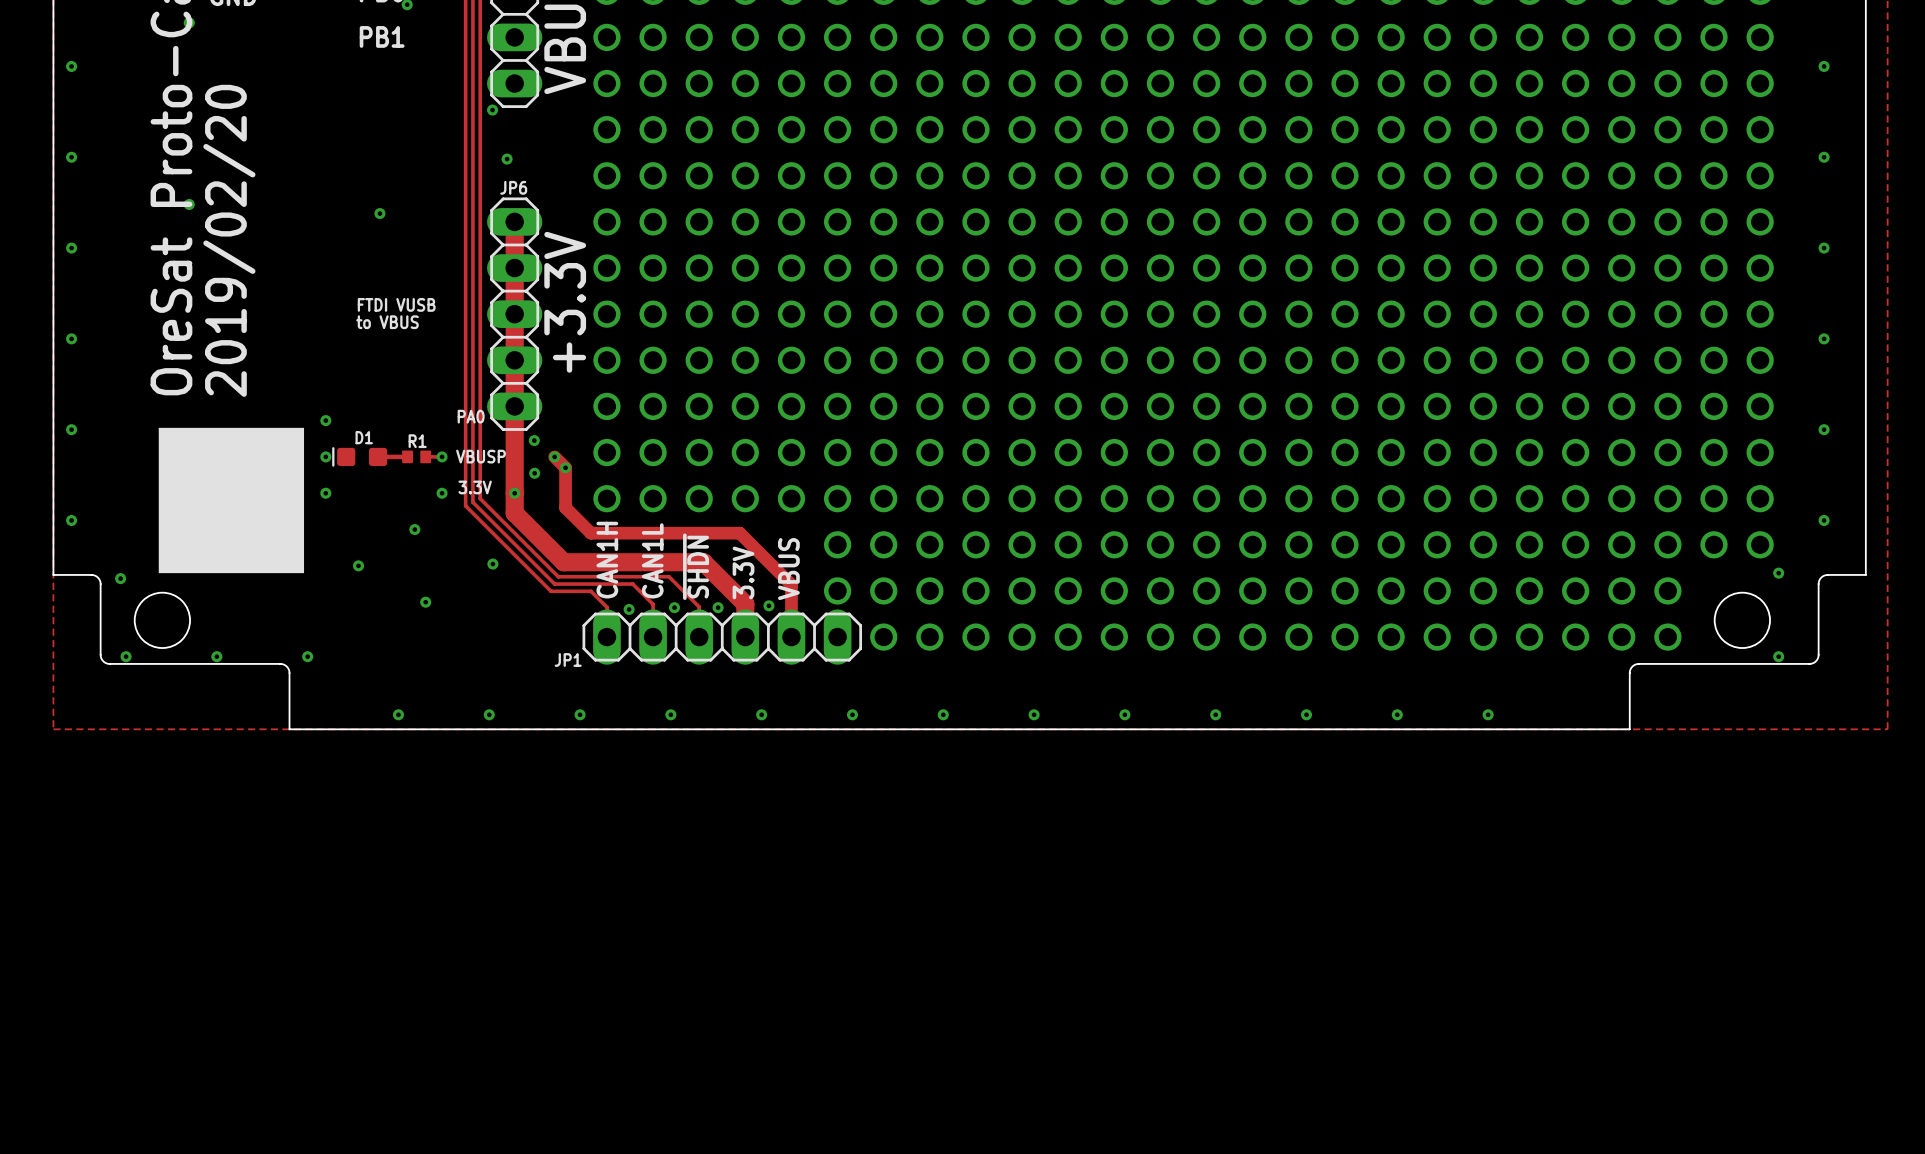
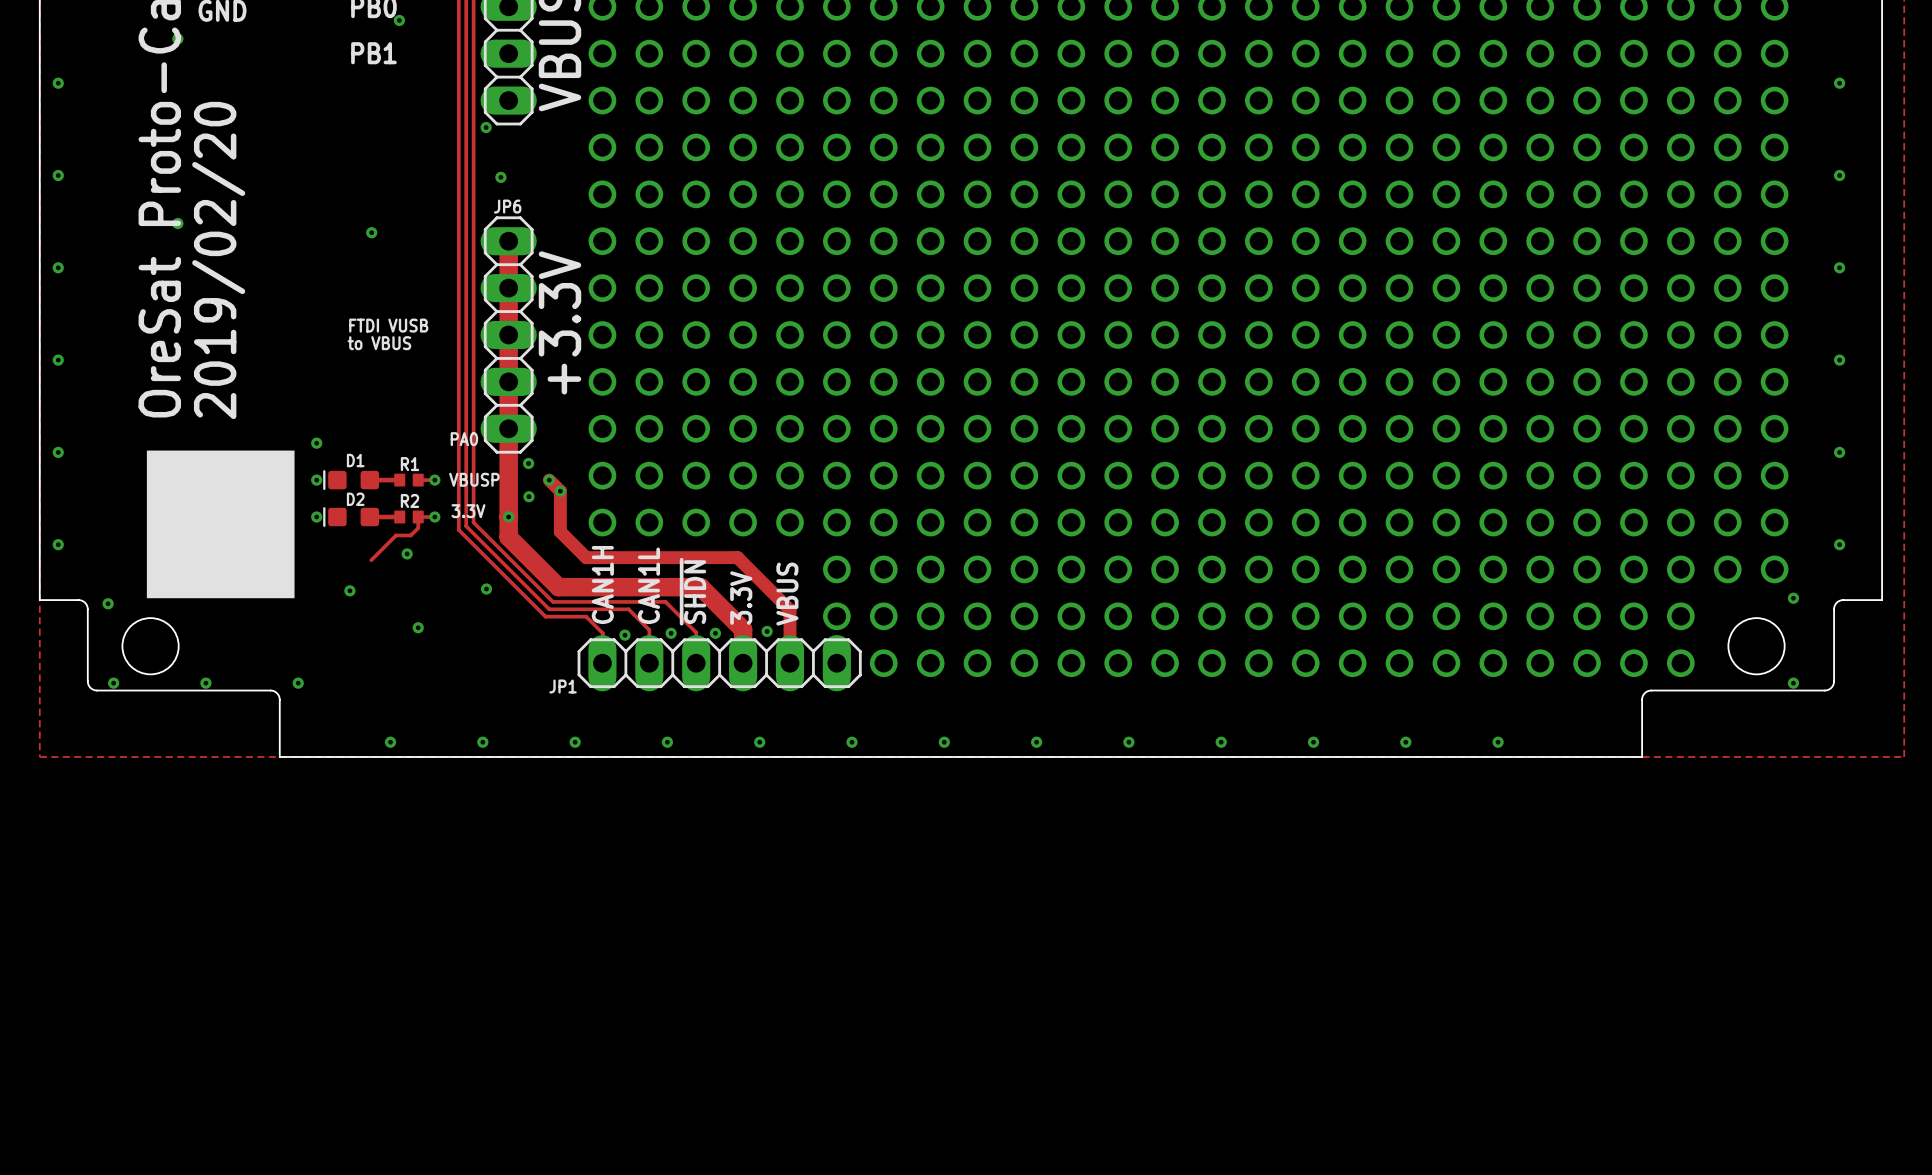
D2: none -> (351, 517)
track: none -> (369, 517) (399, 517)
R2: none -> (408, 517)
track: none -> (434, 517) (418, 517) (418, 528) (410, 535) (396, 535) (371, 560)

